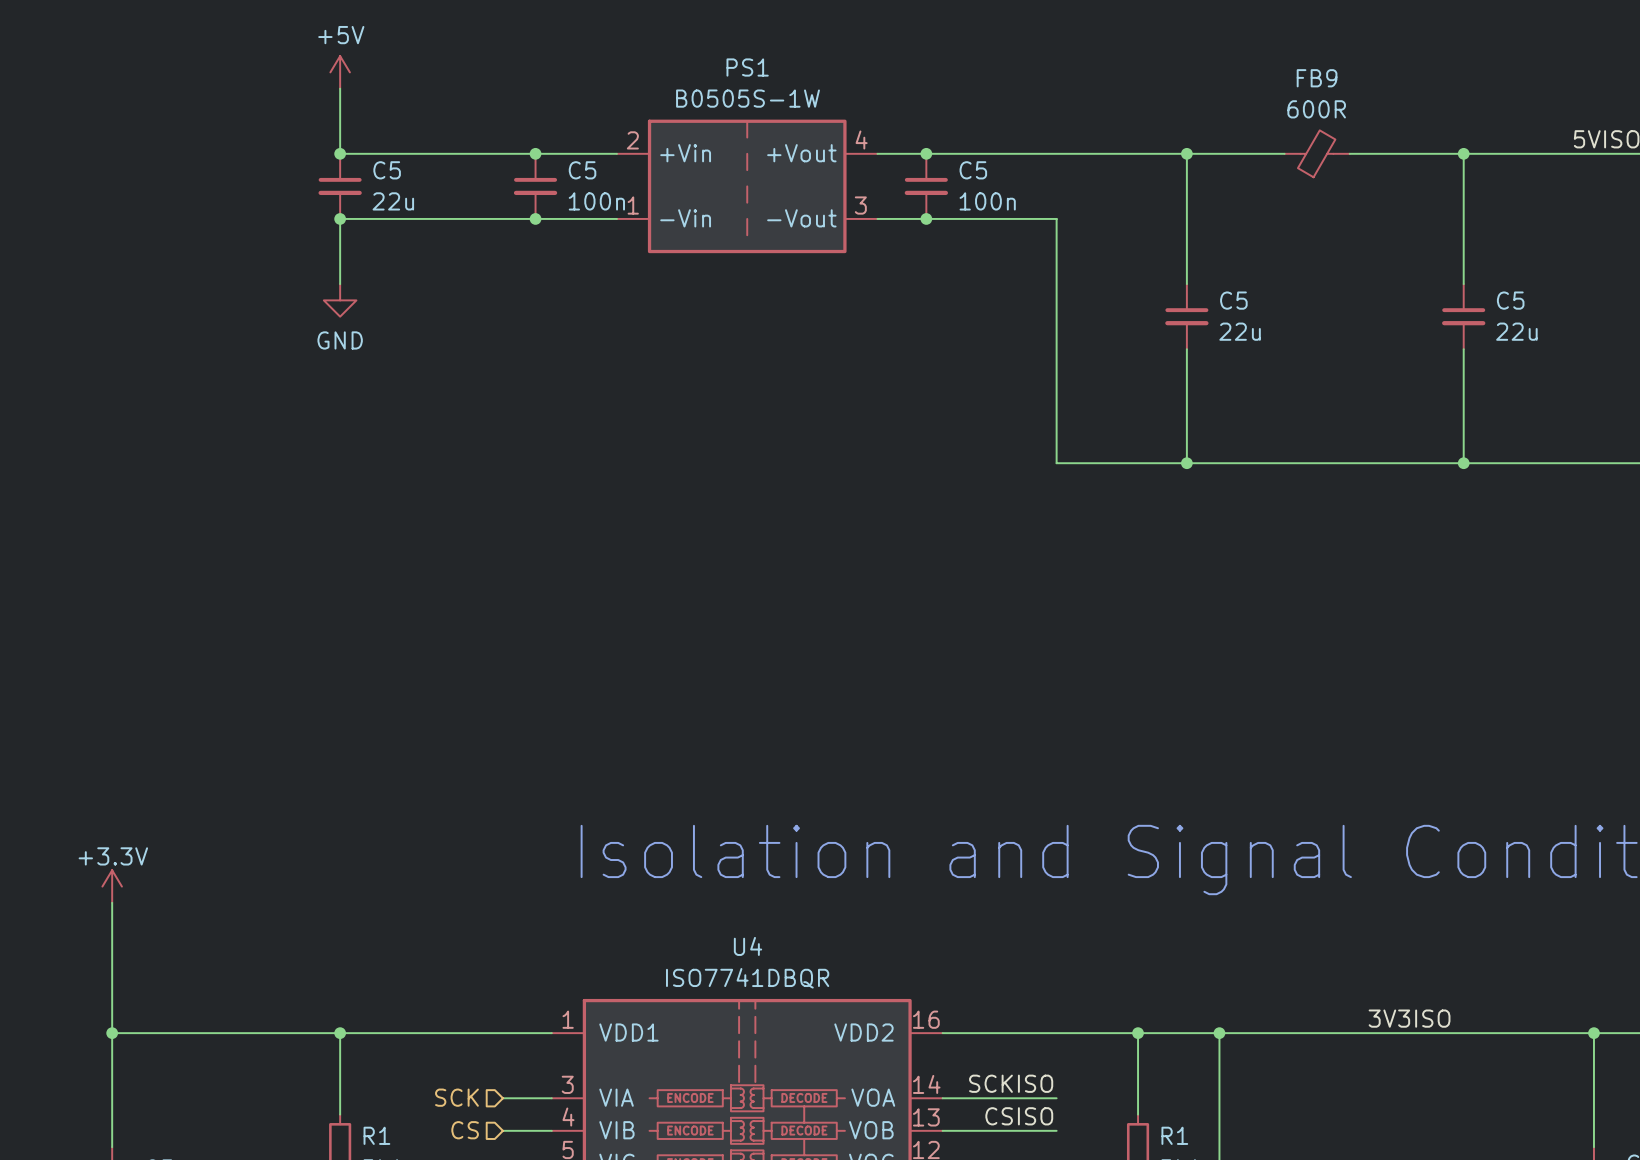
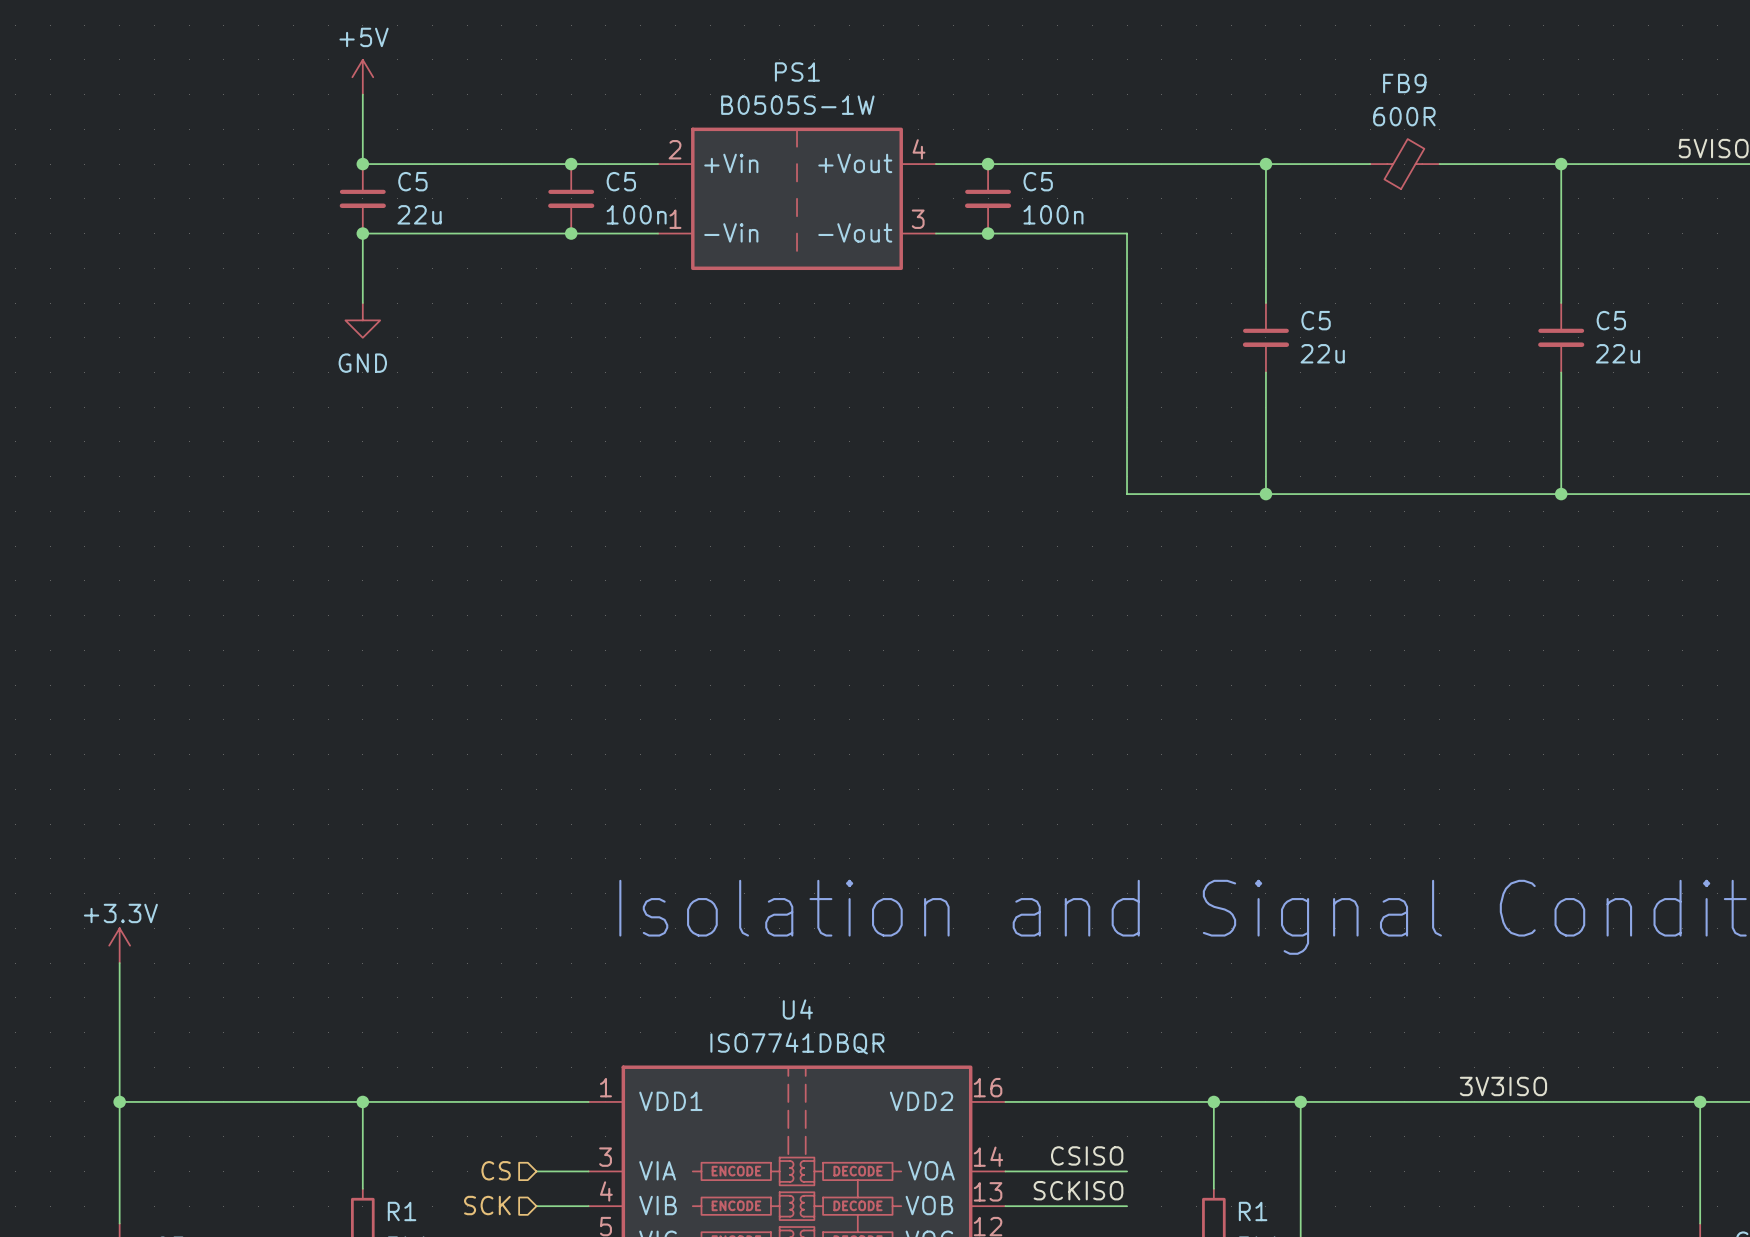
label: SCKISO (1011, 1083) -> CSISO (1087, 1155)
hierarchical label: SCK (456, 1097) -> CS (496, 1170)
label: CSISO (1019, 1116) -> SCKISO (1078, 1190)
hierarchical label: CS (465, 1130) -> SCK (487, 1205)

